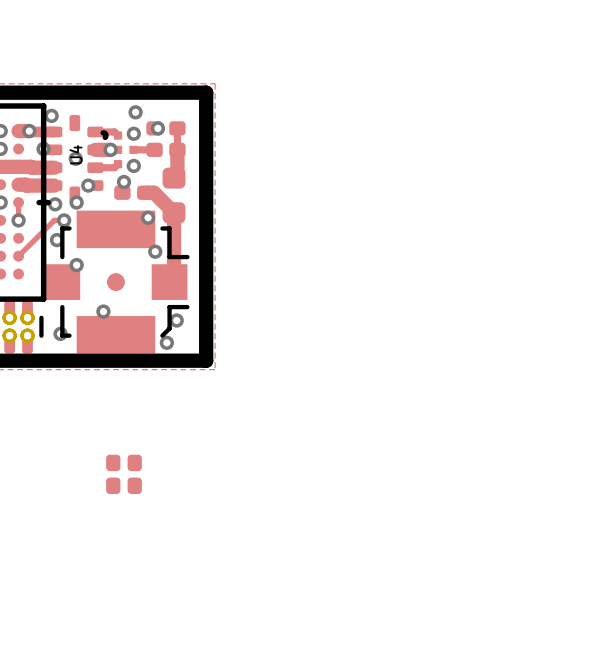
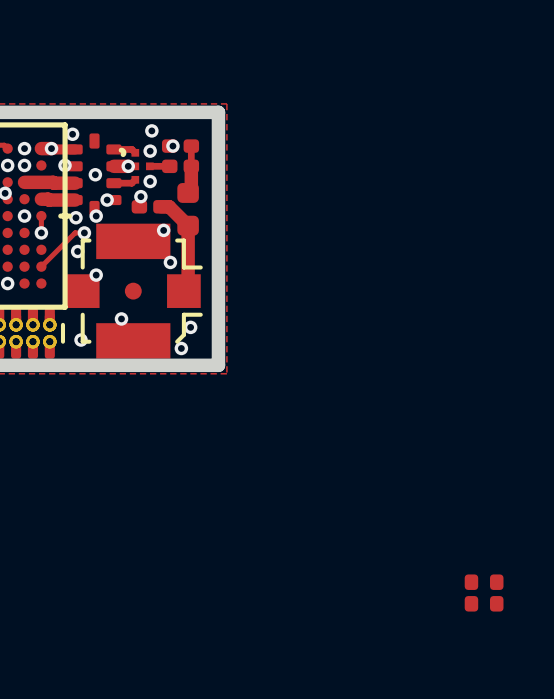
U4 name: U4 (75, 154) -> none
part: (113, 474) -> none
part: (134, 474) -> none
part: none -> (471, 593)
part: none -> (496, 593)

